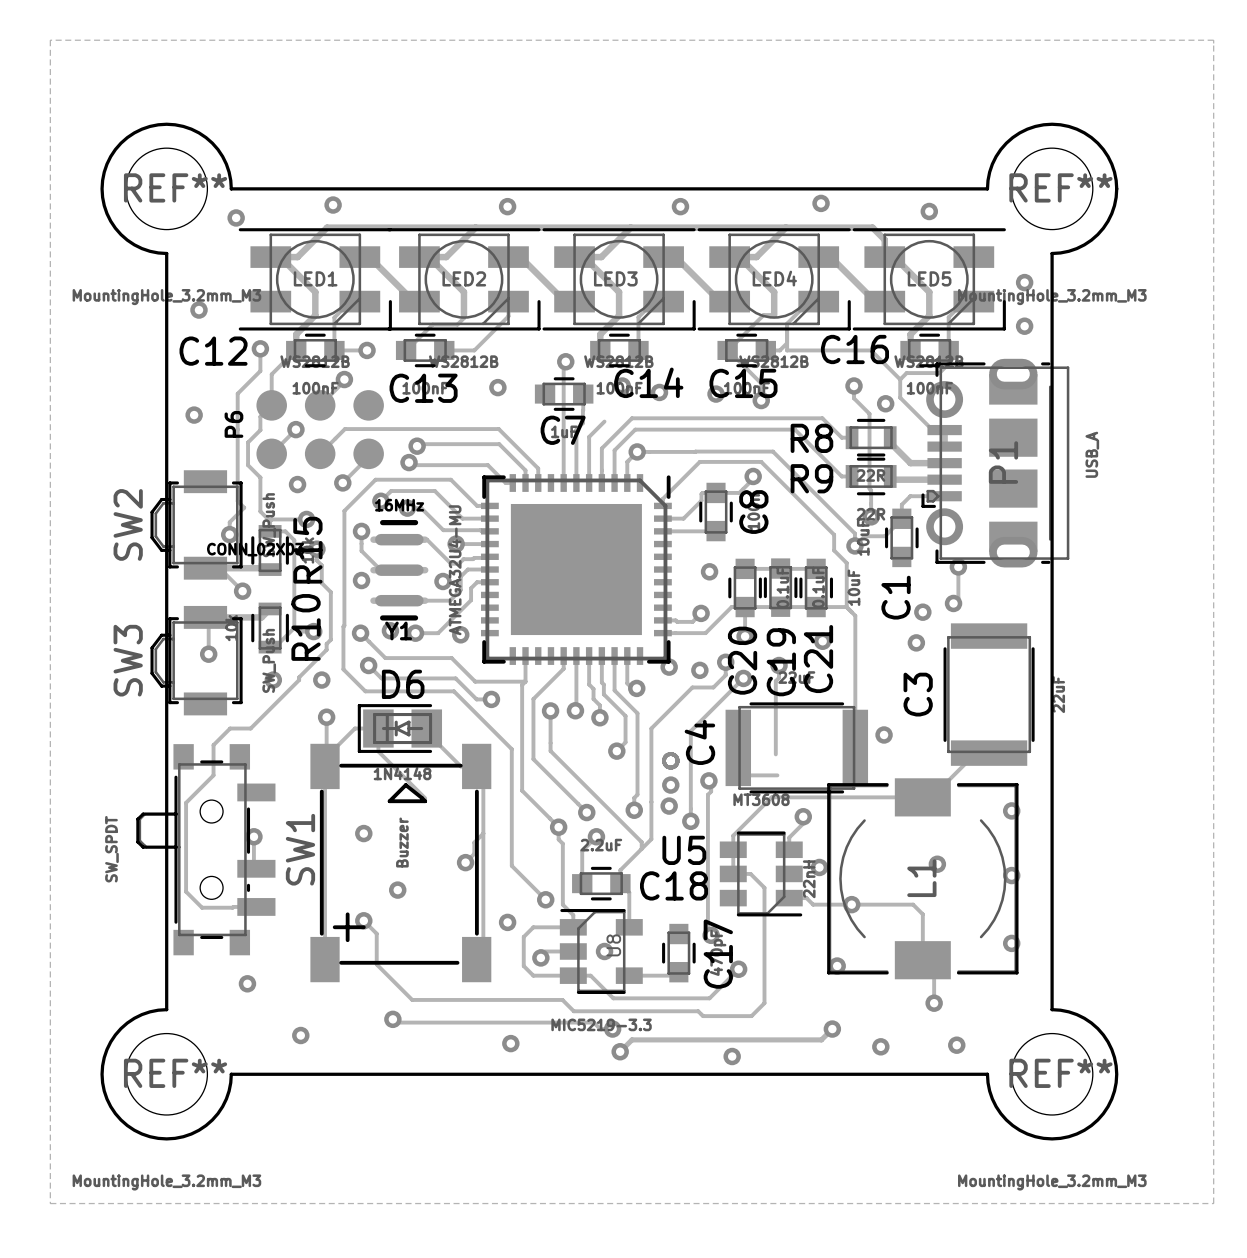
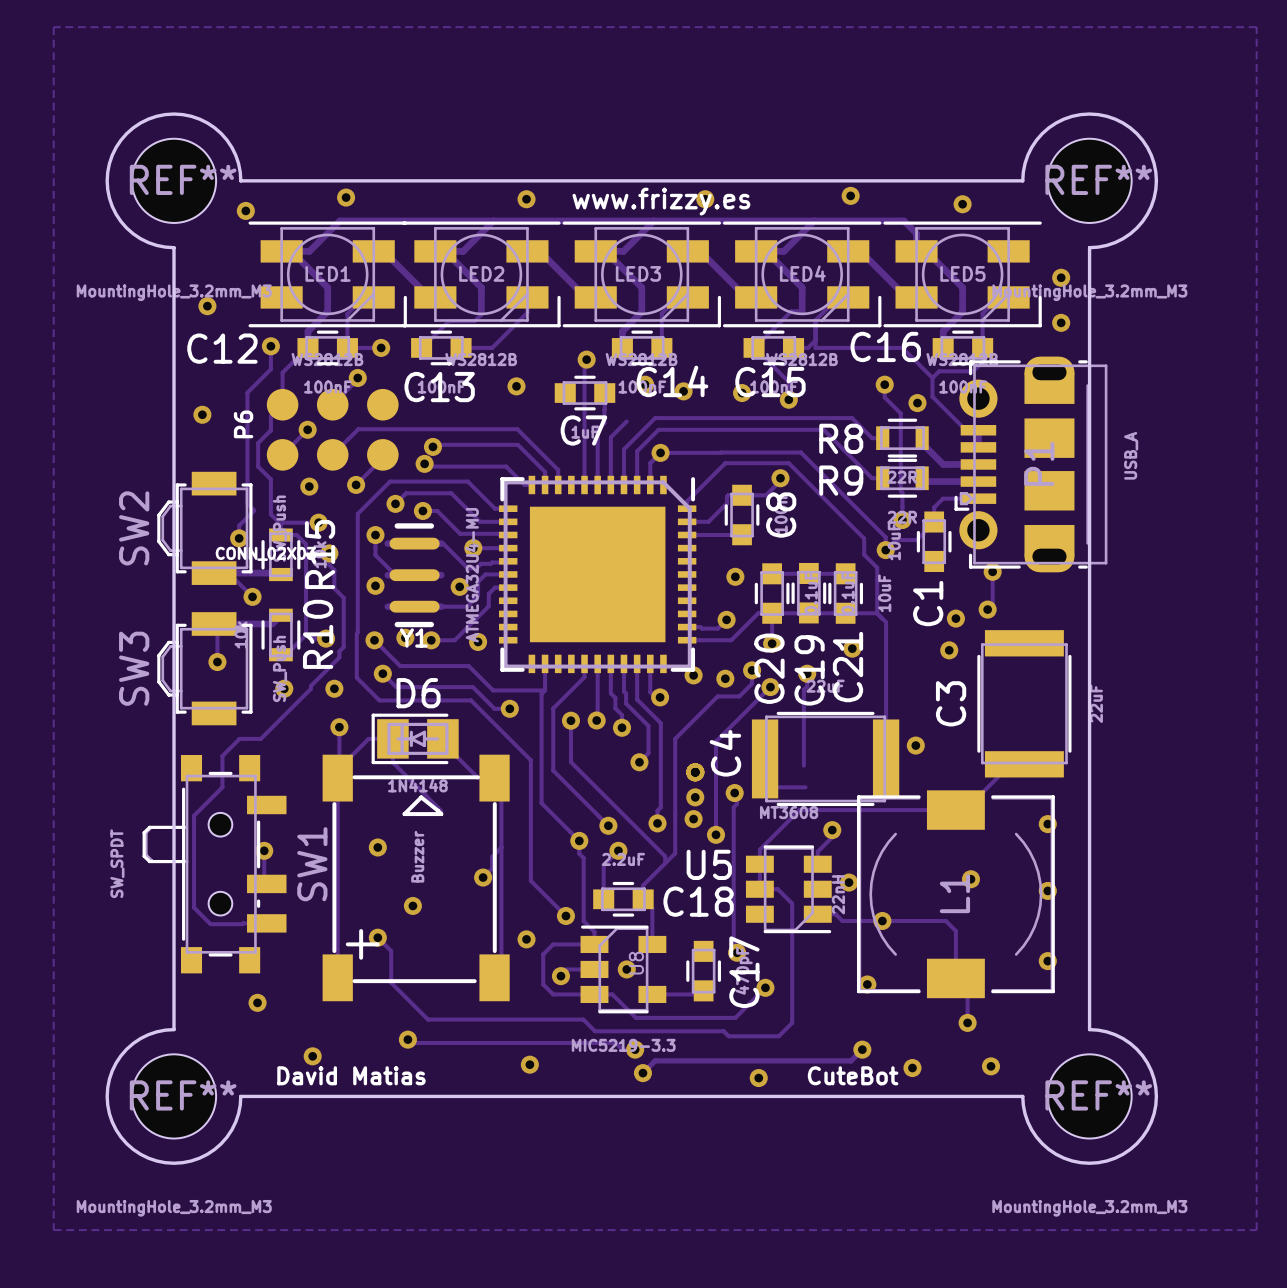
text: none -> www.frizzy.es (661, 201)
Y1 value: 16MHz (399, 505) -> none
text: none -> David Matias (351, 1075)
text: none -> CuteBot (853, 1075)

